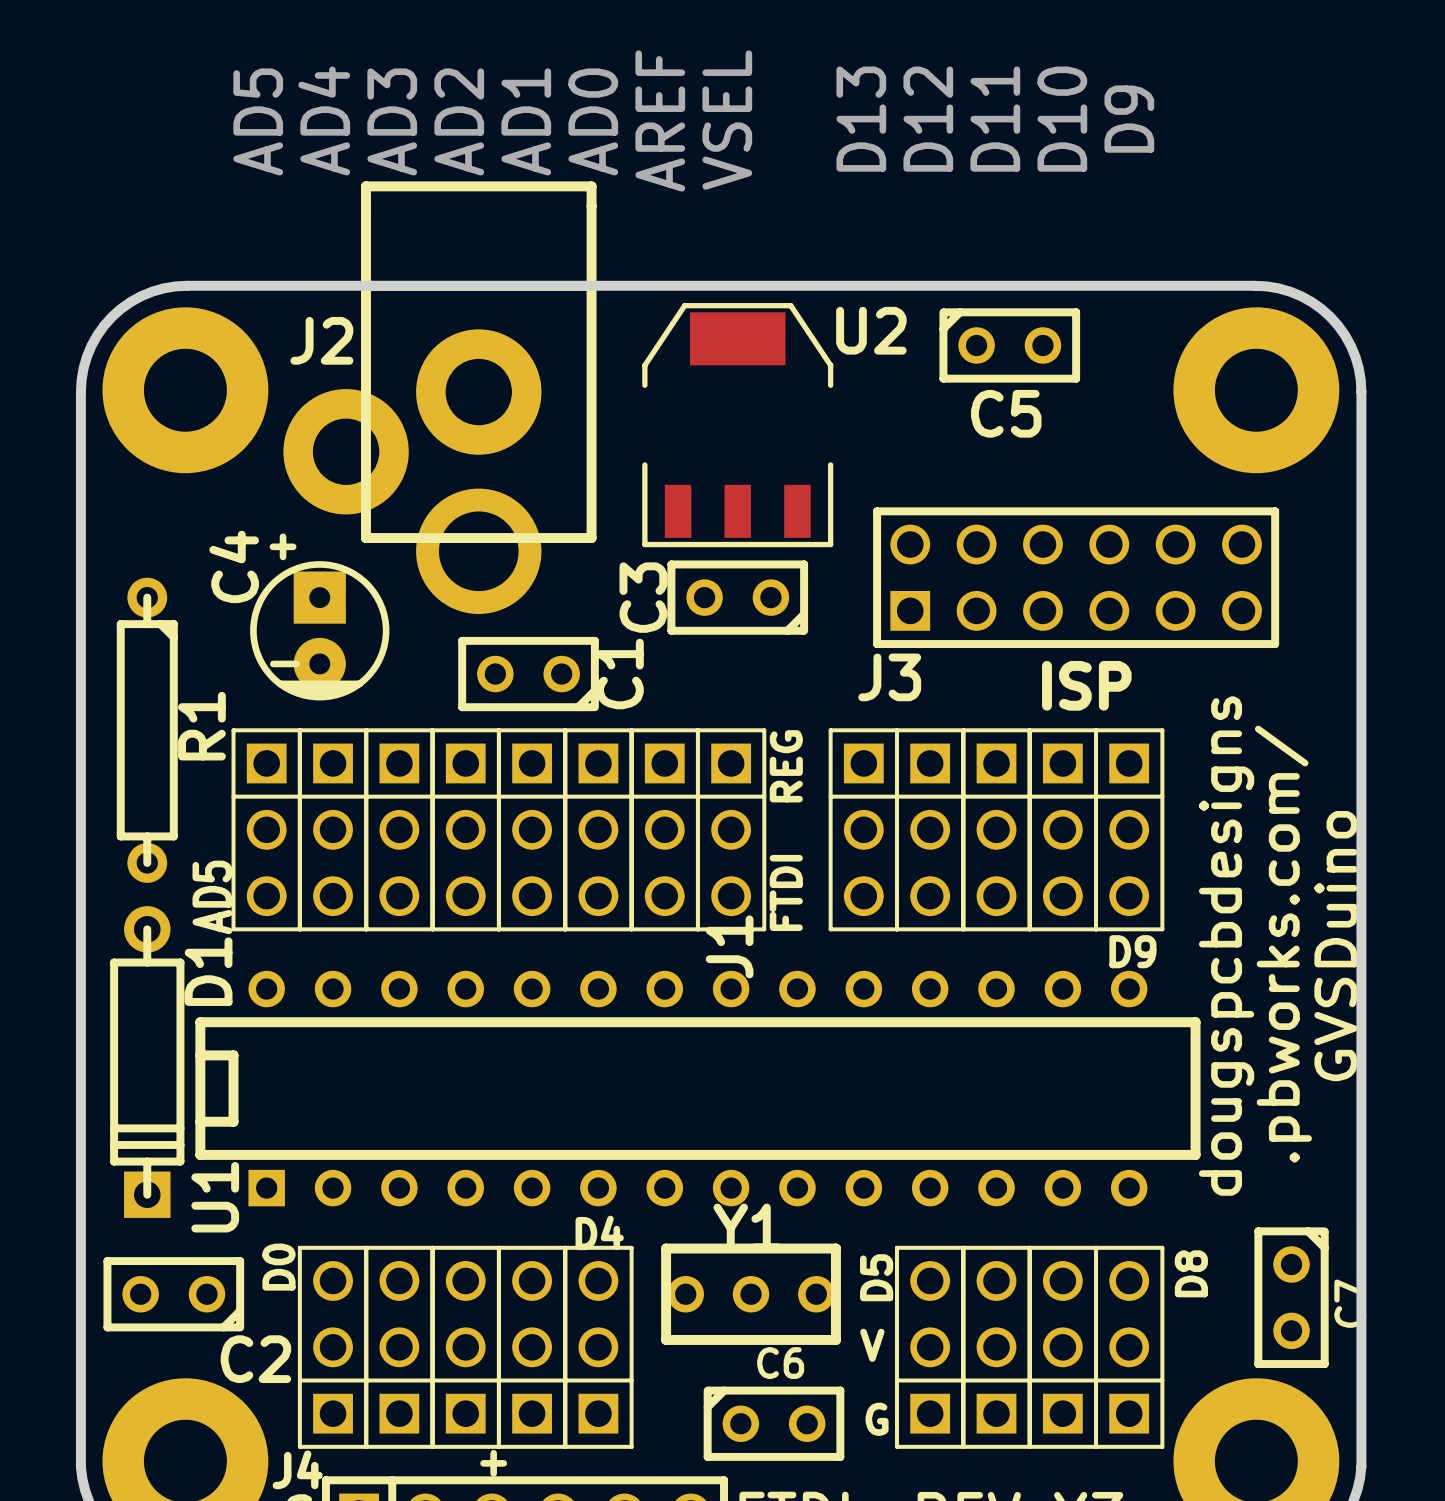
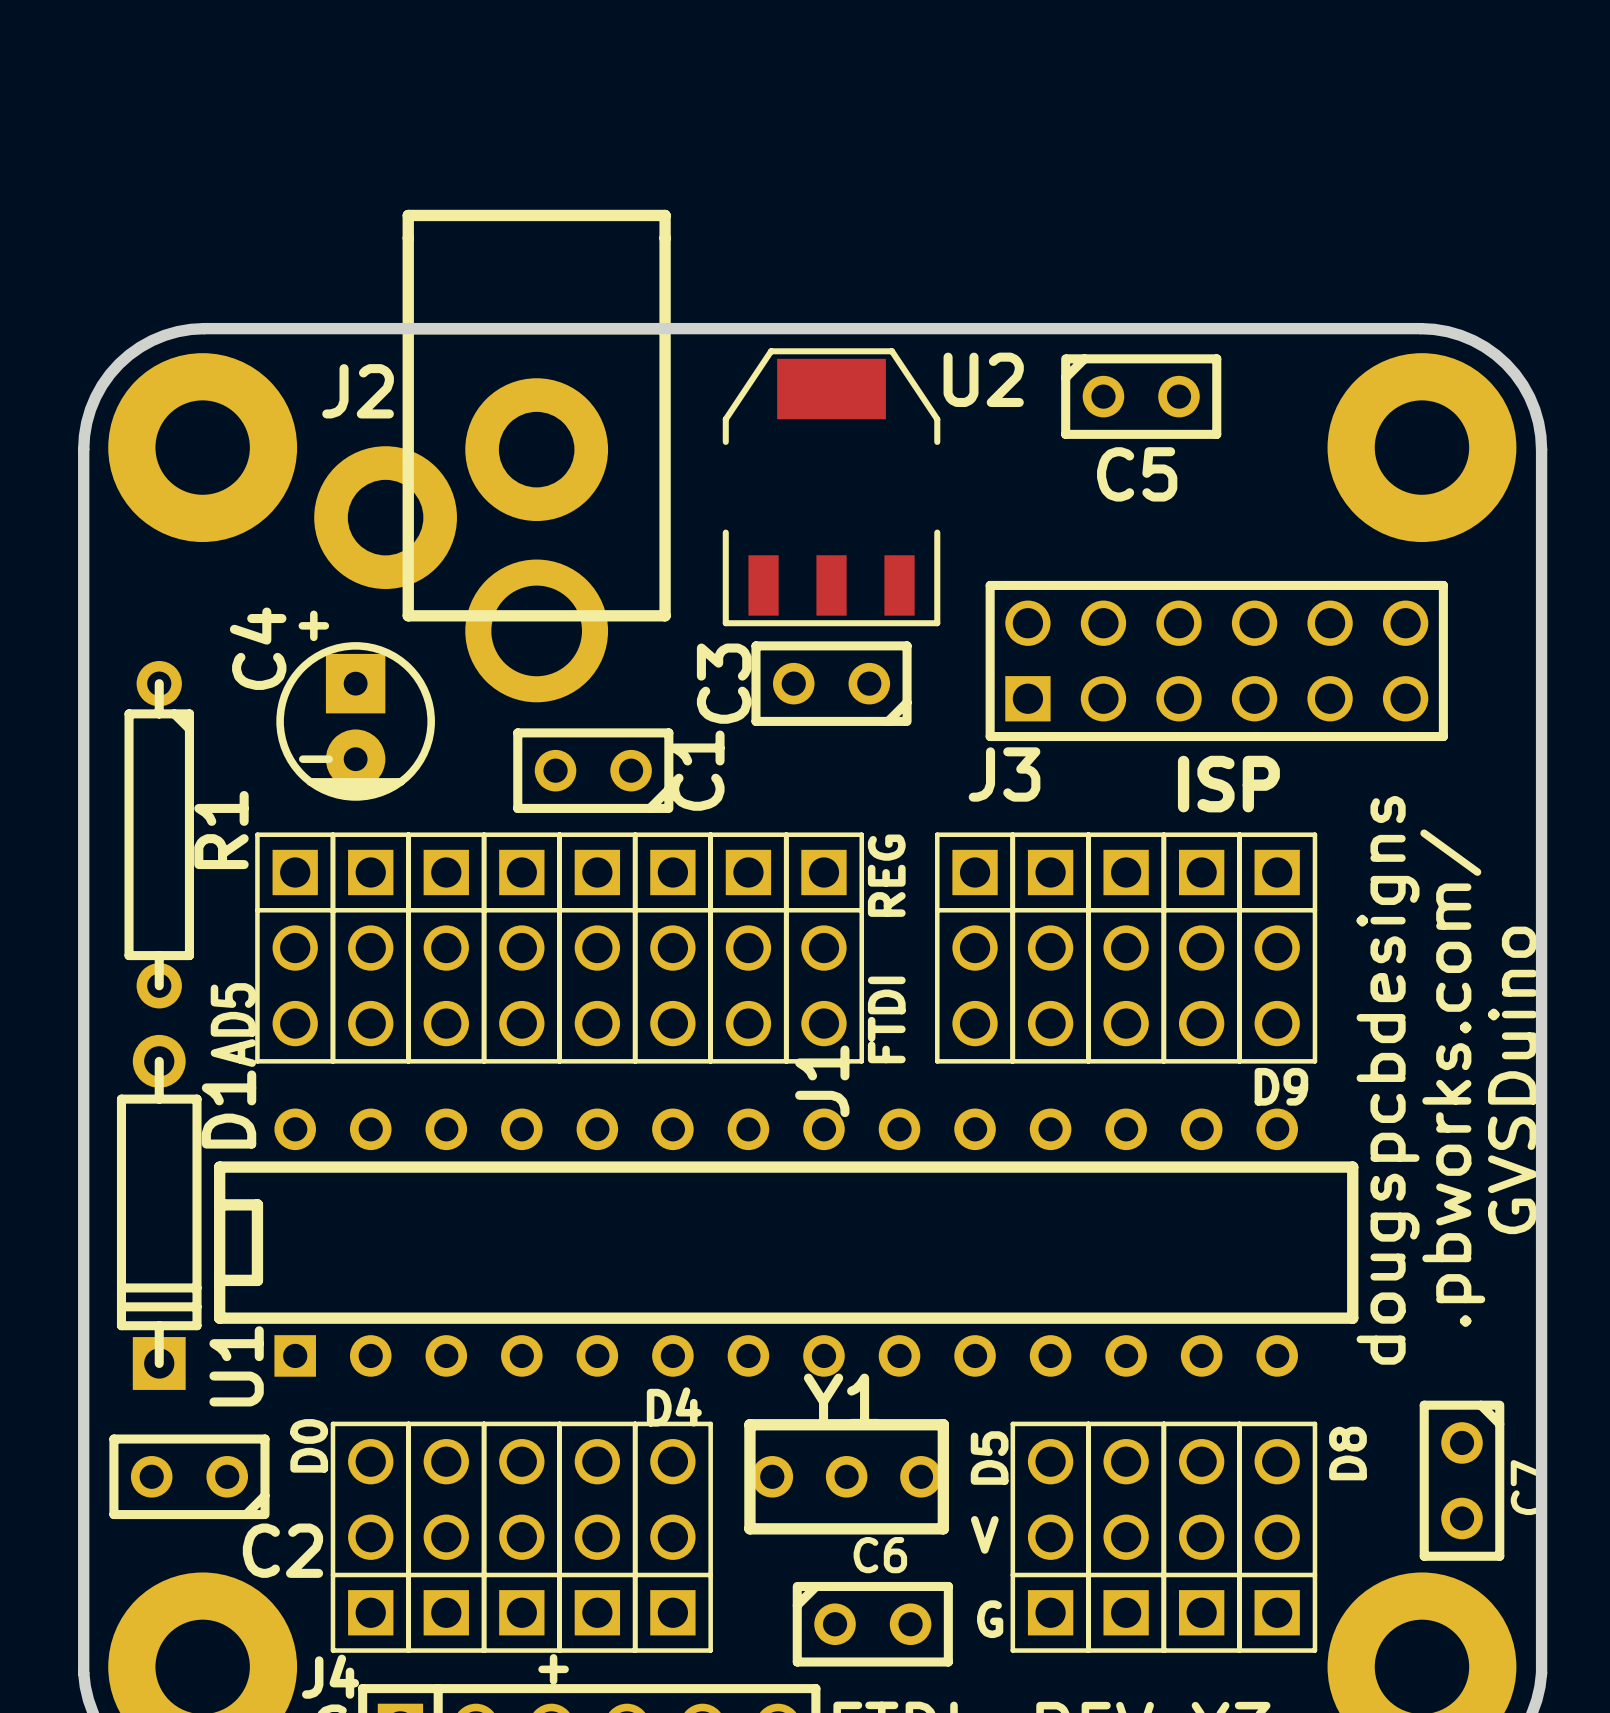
text: D13 (861, 119) -> none
text: D12 (928, 119) -> none
text: D11 (995, 119) -> none
text: D10 (1062, 119) -> none
text: D9 (1129, 119) -> none
text: AD4 (324, 120) -> none
text: AREF (660, 120) -> none
text: VSEL (727, 120) -> none
text: AD5 (258, 121) -> none
text: AD3 (392, 121) -> none
text: AD2 (459, 121) -> none
text: AD1 (526, 121) -> none
text: AD0 (593, 121) -> none

